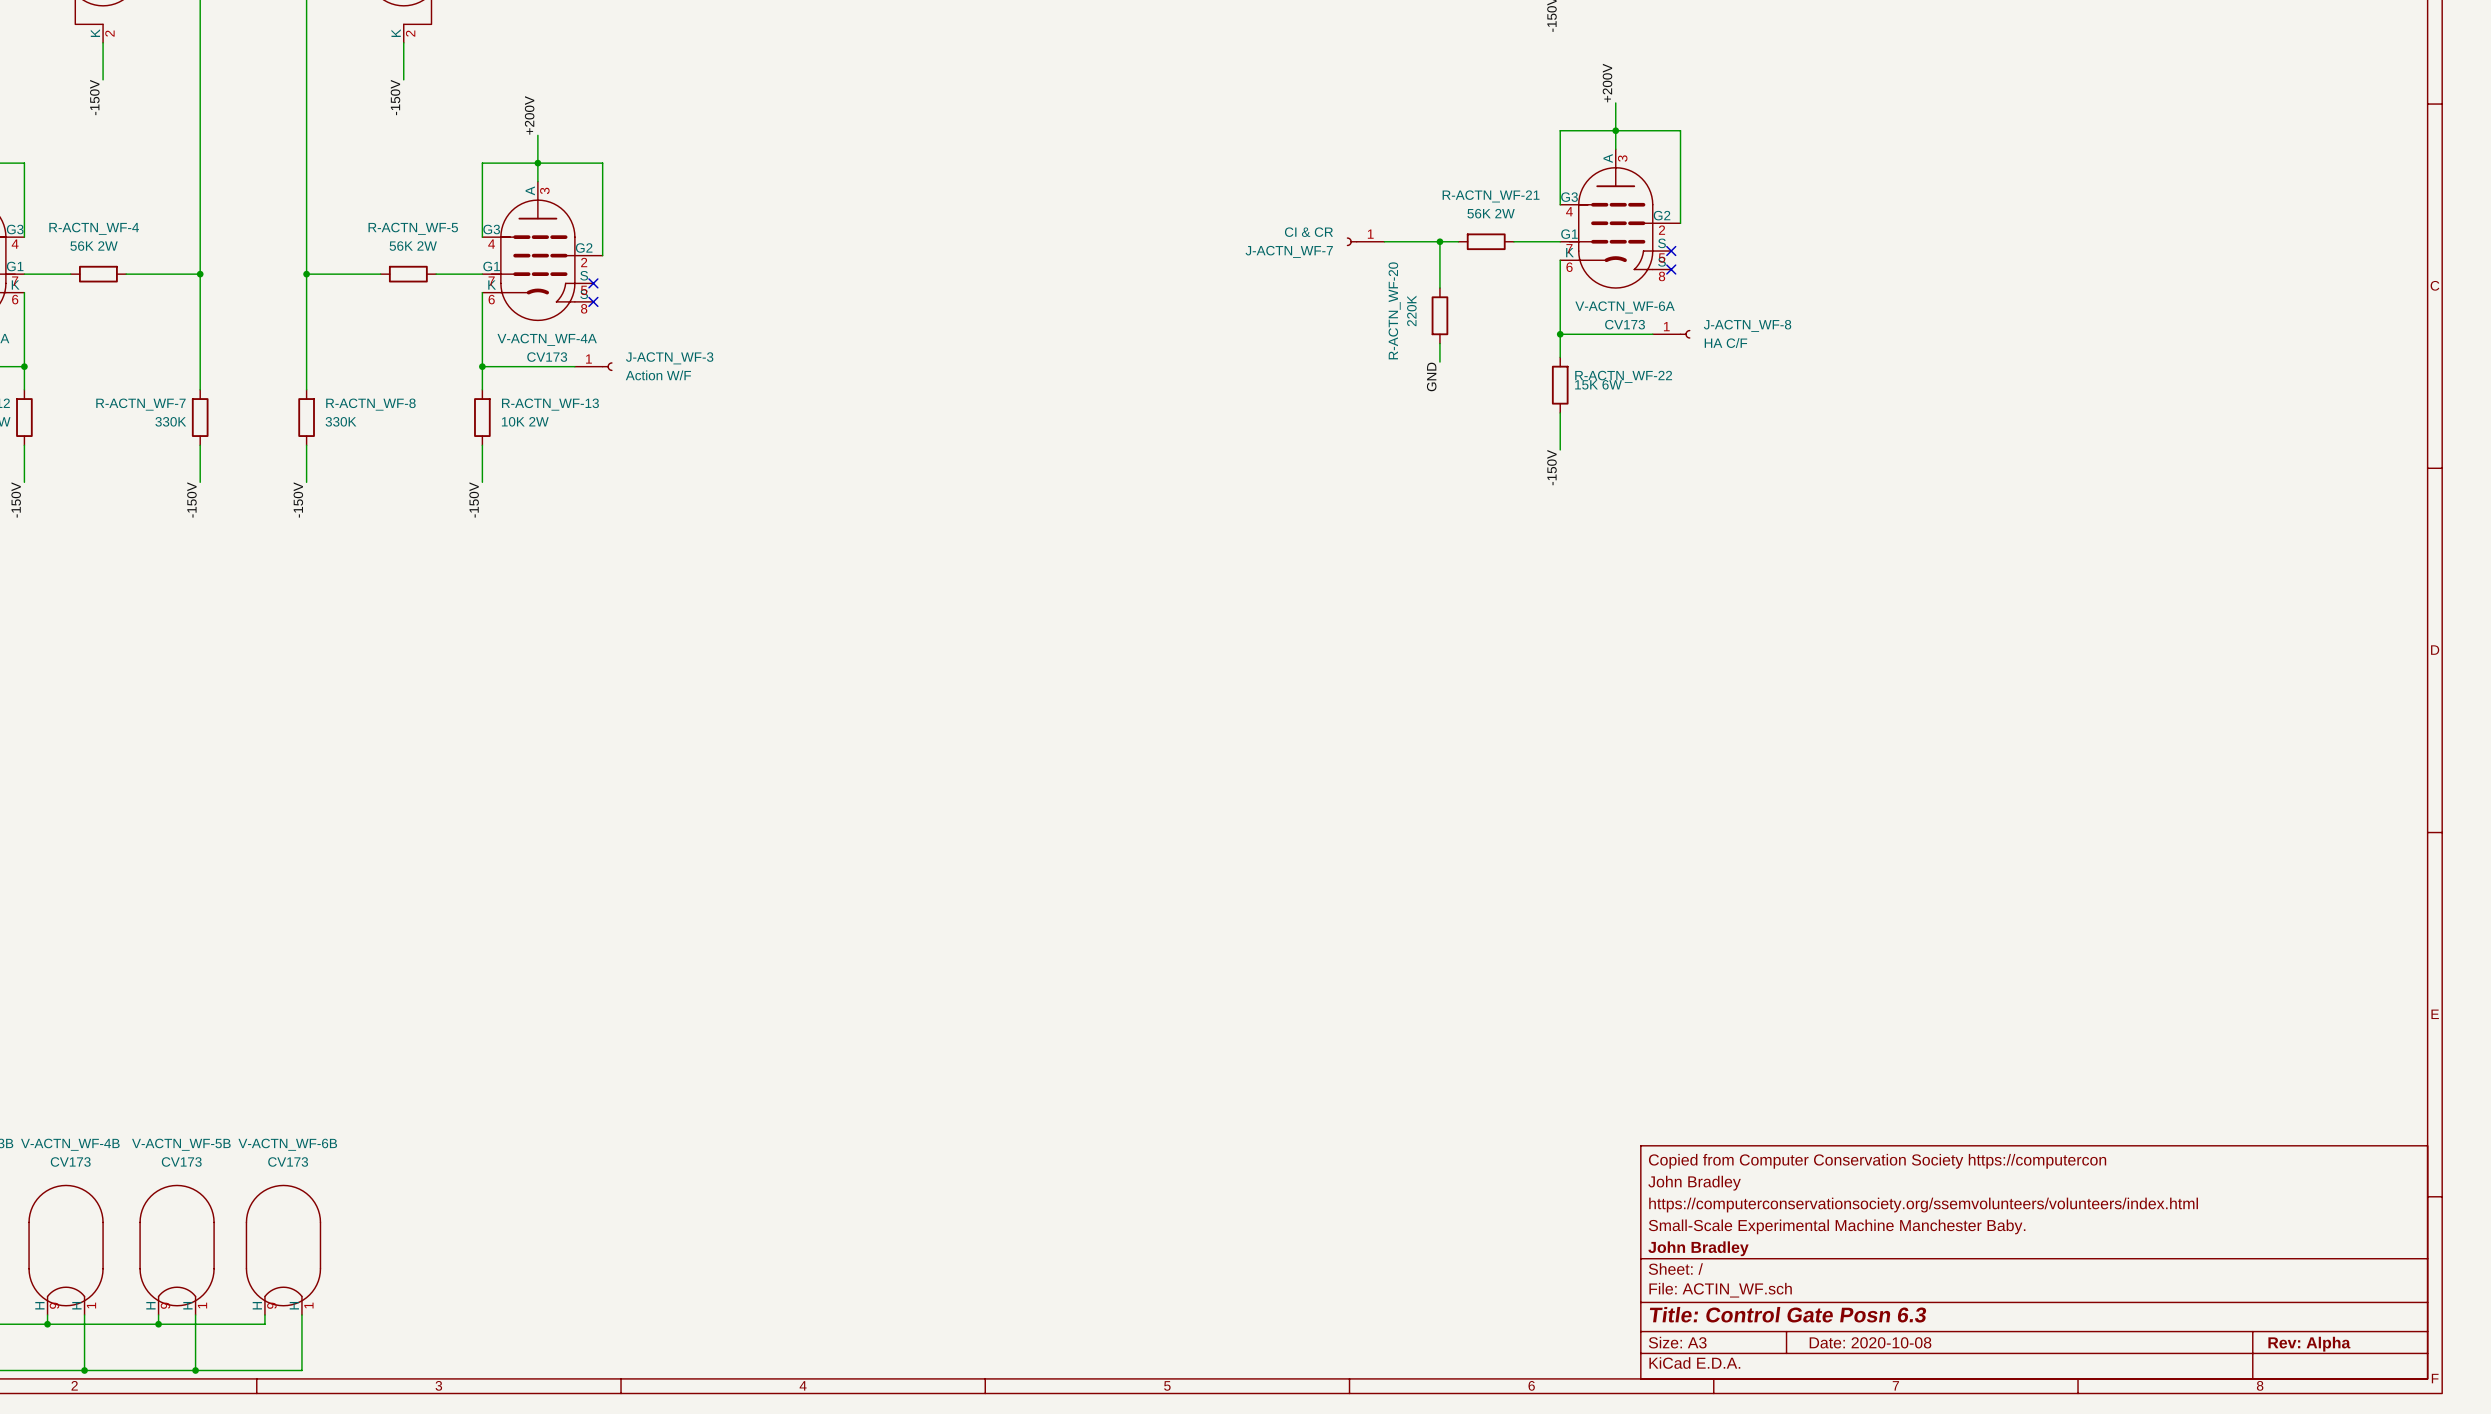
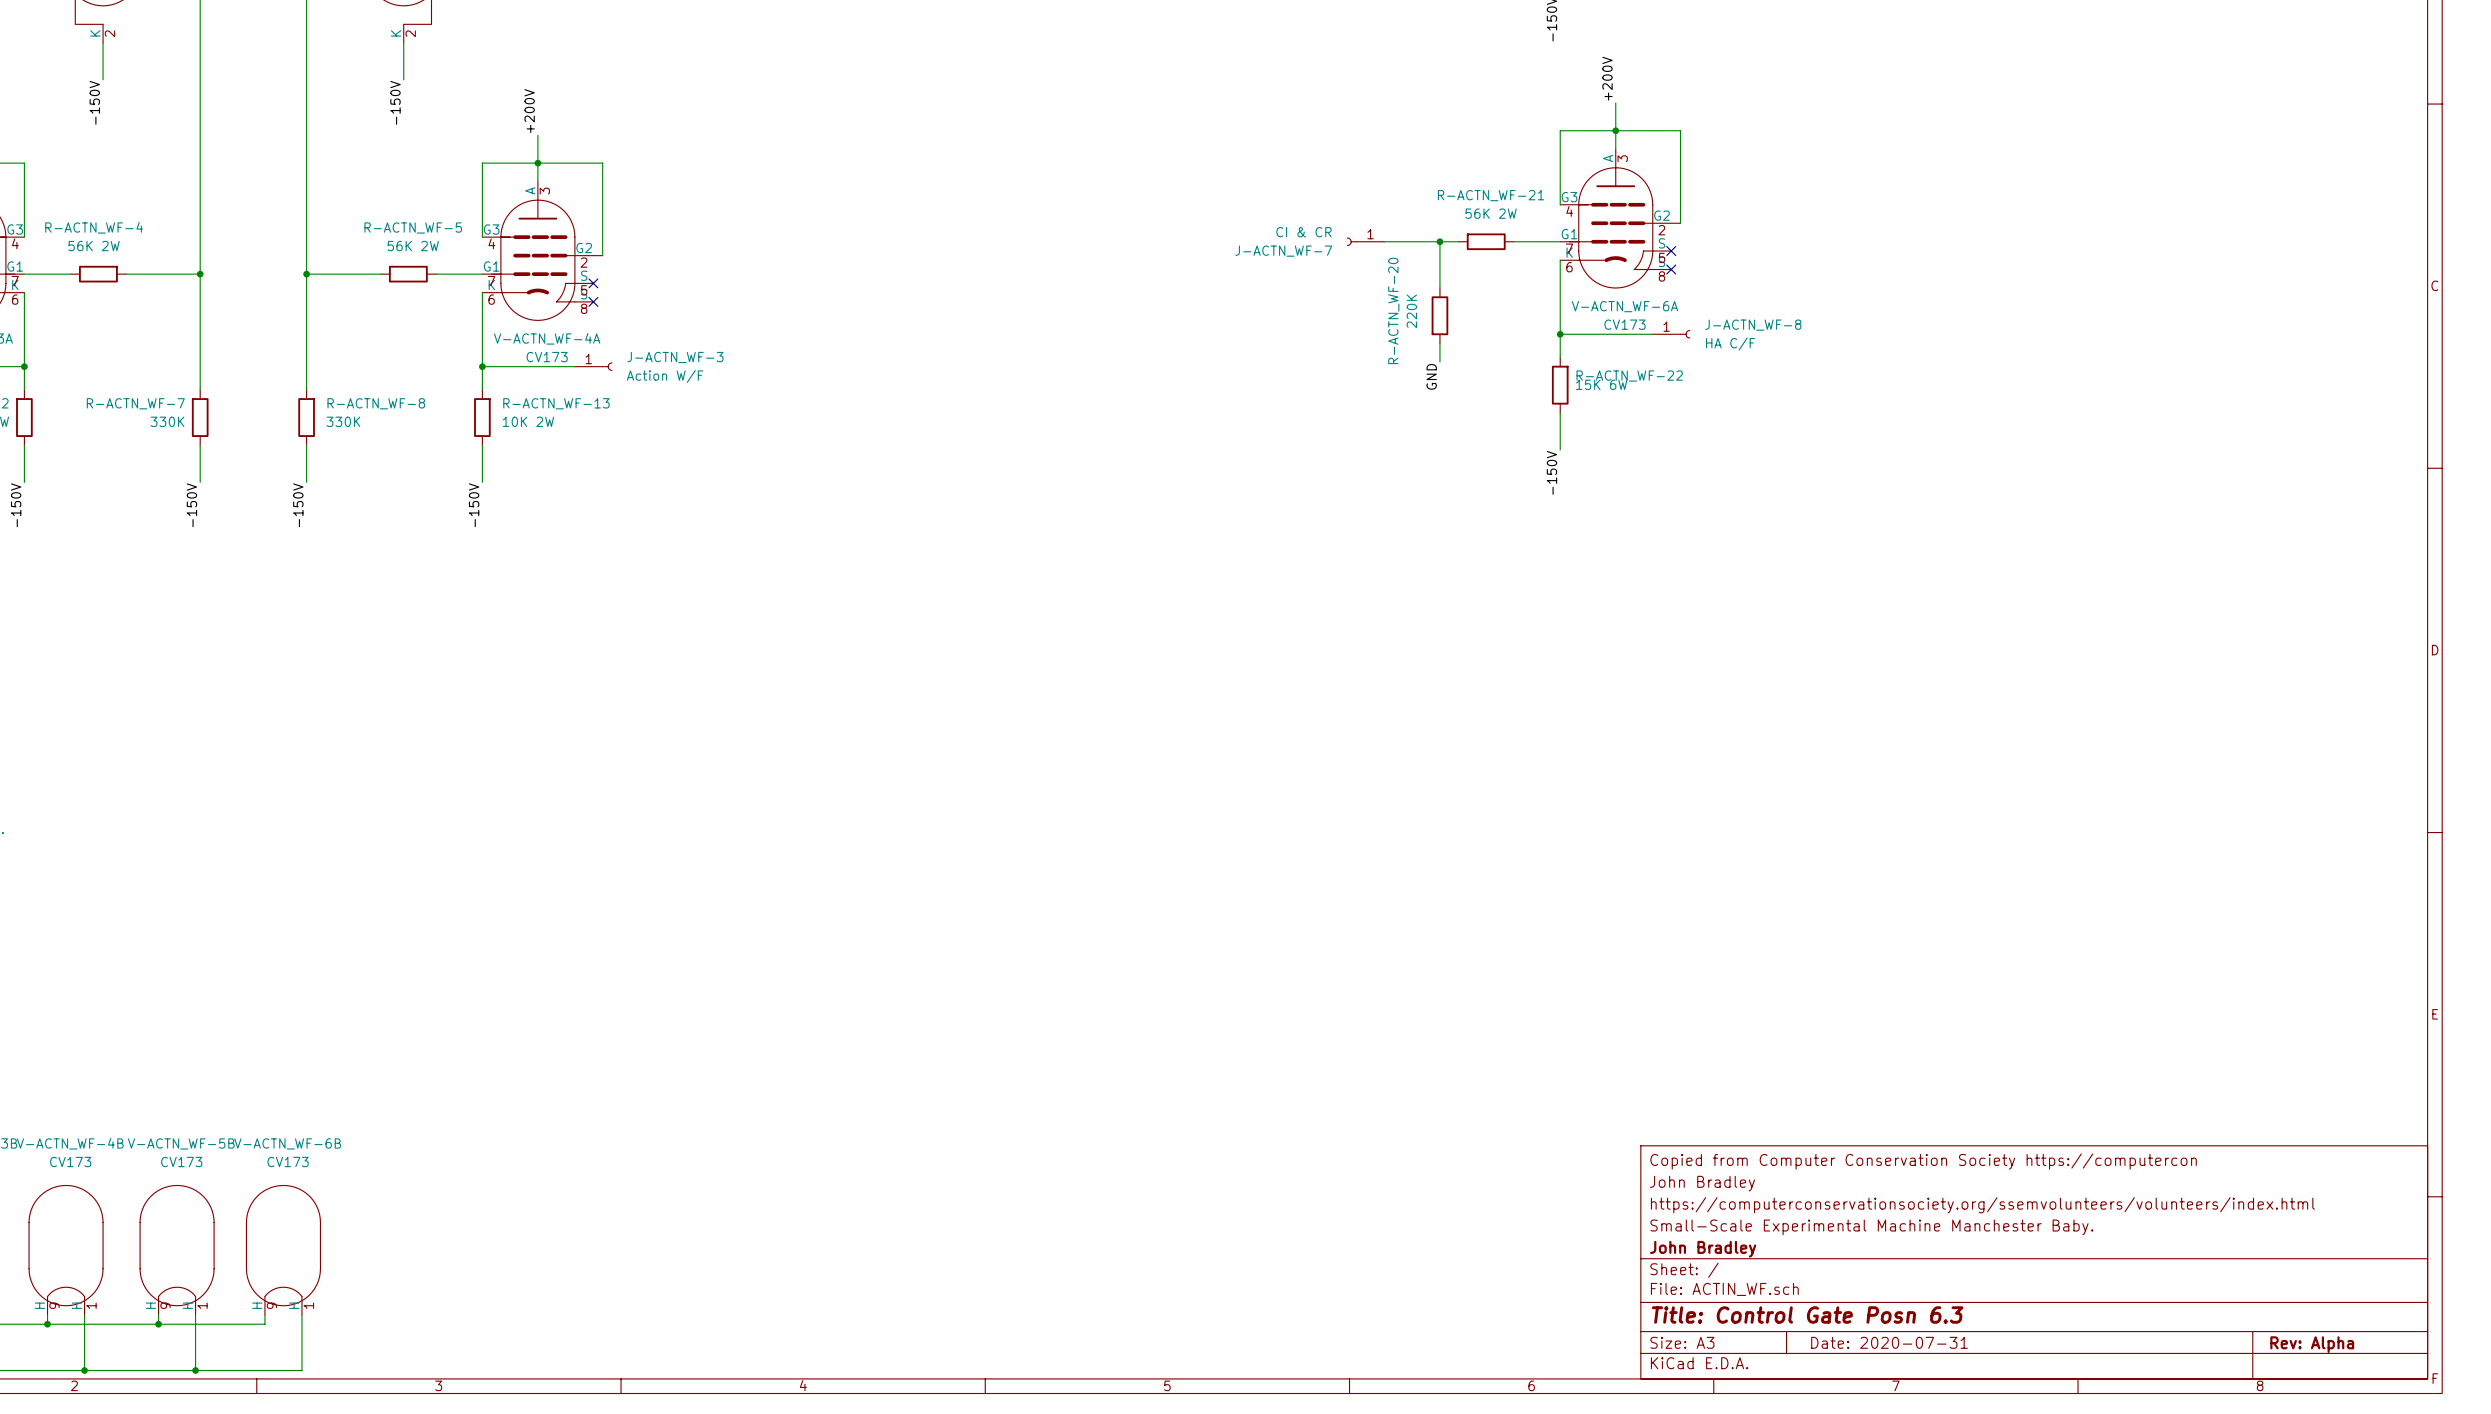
title block: Date: 2020-10-08 (1870, 1342) -> Date: 2020-07-31 (1889, 1342)

